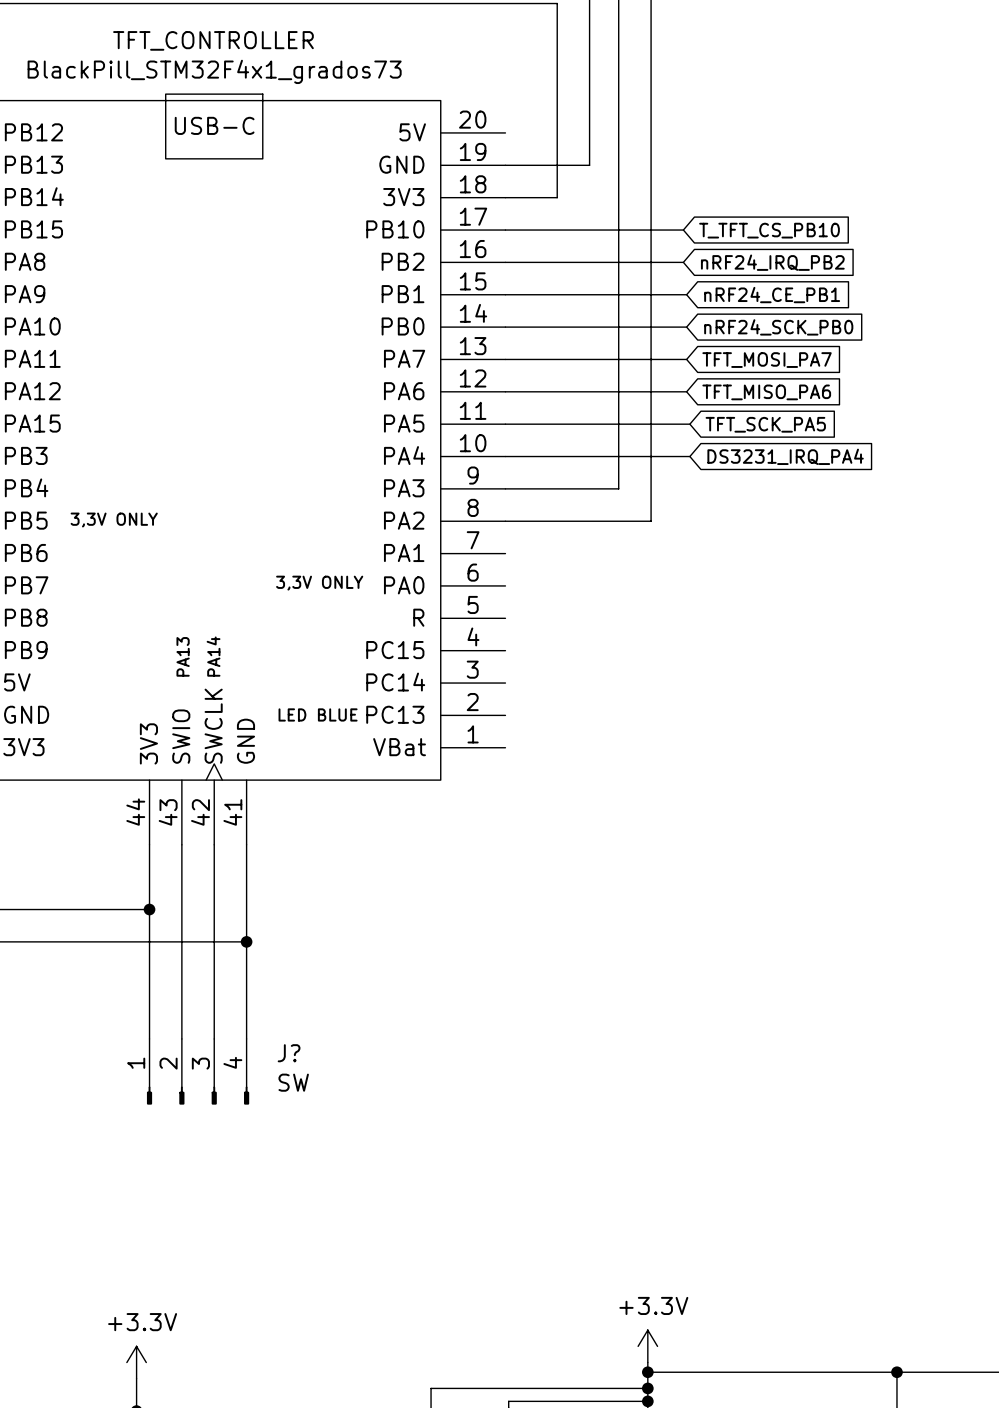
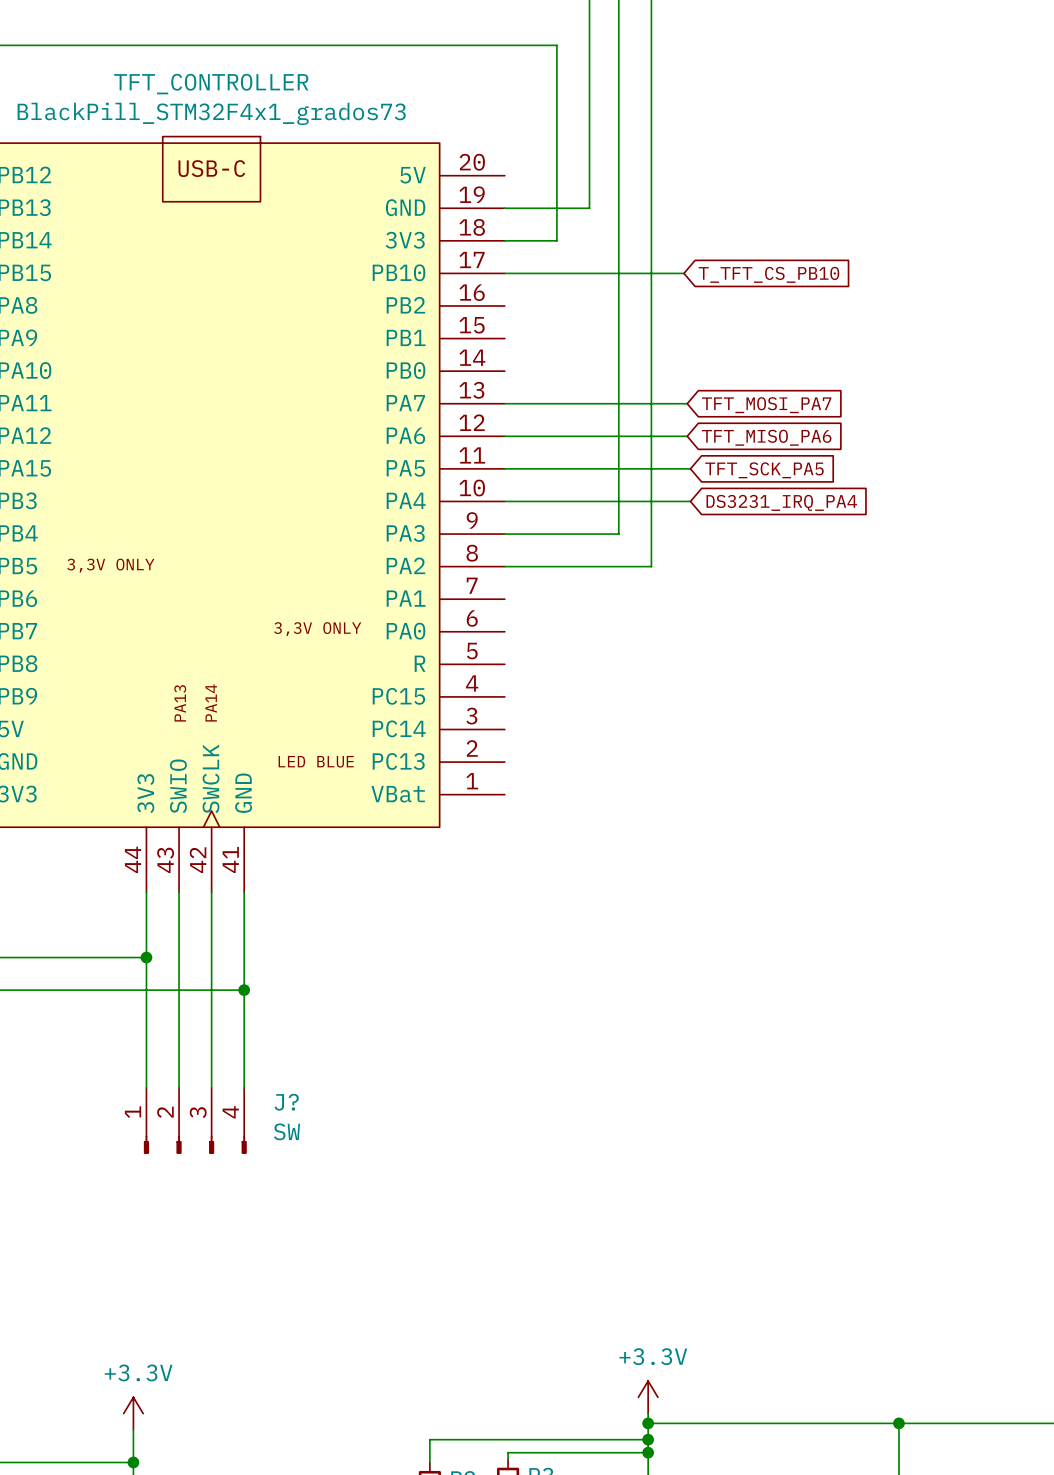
wire: (505, 262) (683, 262) -> none
global label: nRF24_IRQ_PB2 (772, 262) -> none
wire: (505, 294) (686, 294) -> none
global label: nRF24_CE_PB1 (772, 295) -> none
wire: (505, 327) (686, 327) -> none
global label: nRF24_SCK_PB0 (778, 327) -> none

